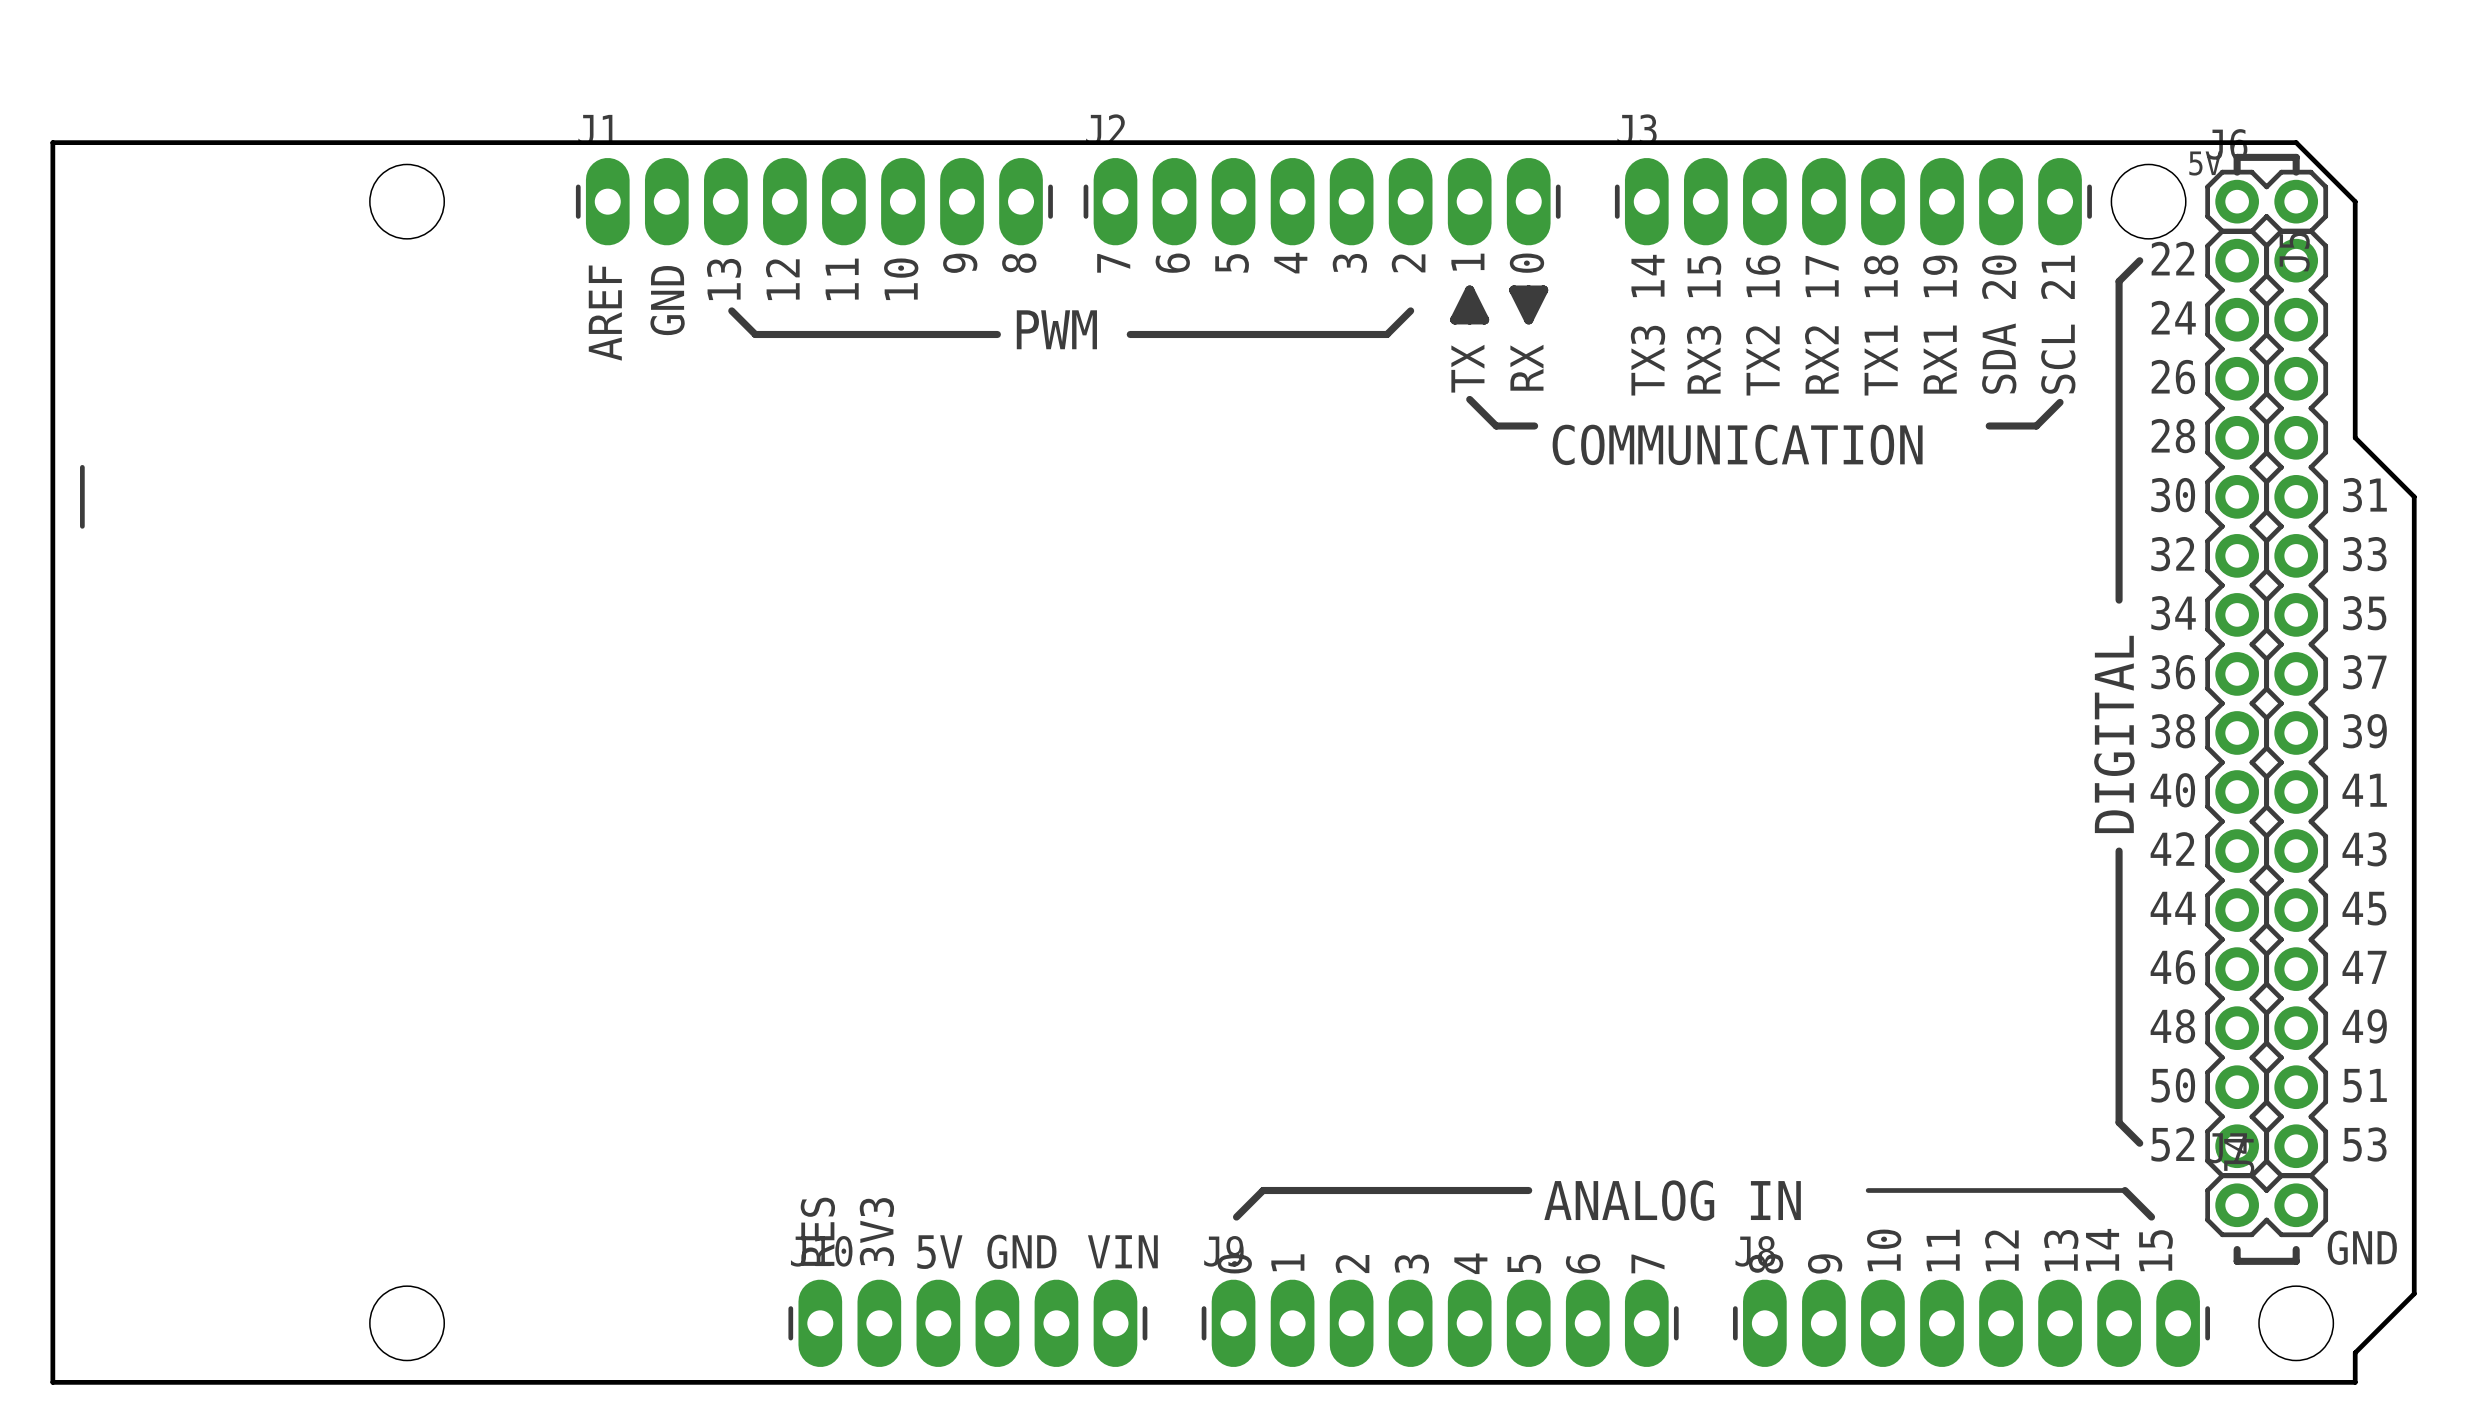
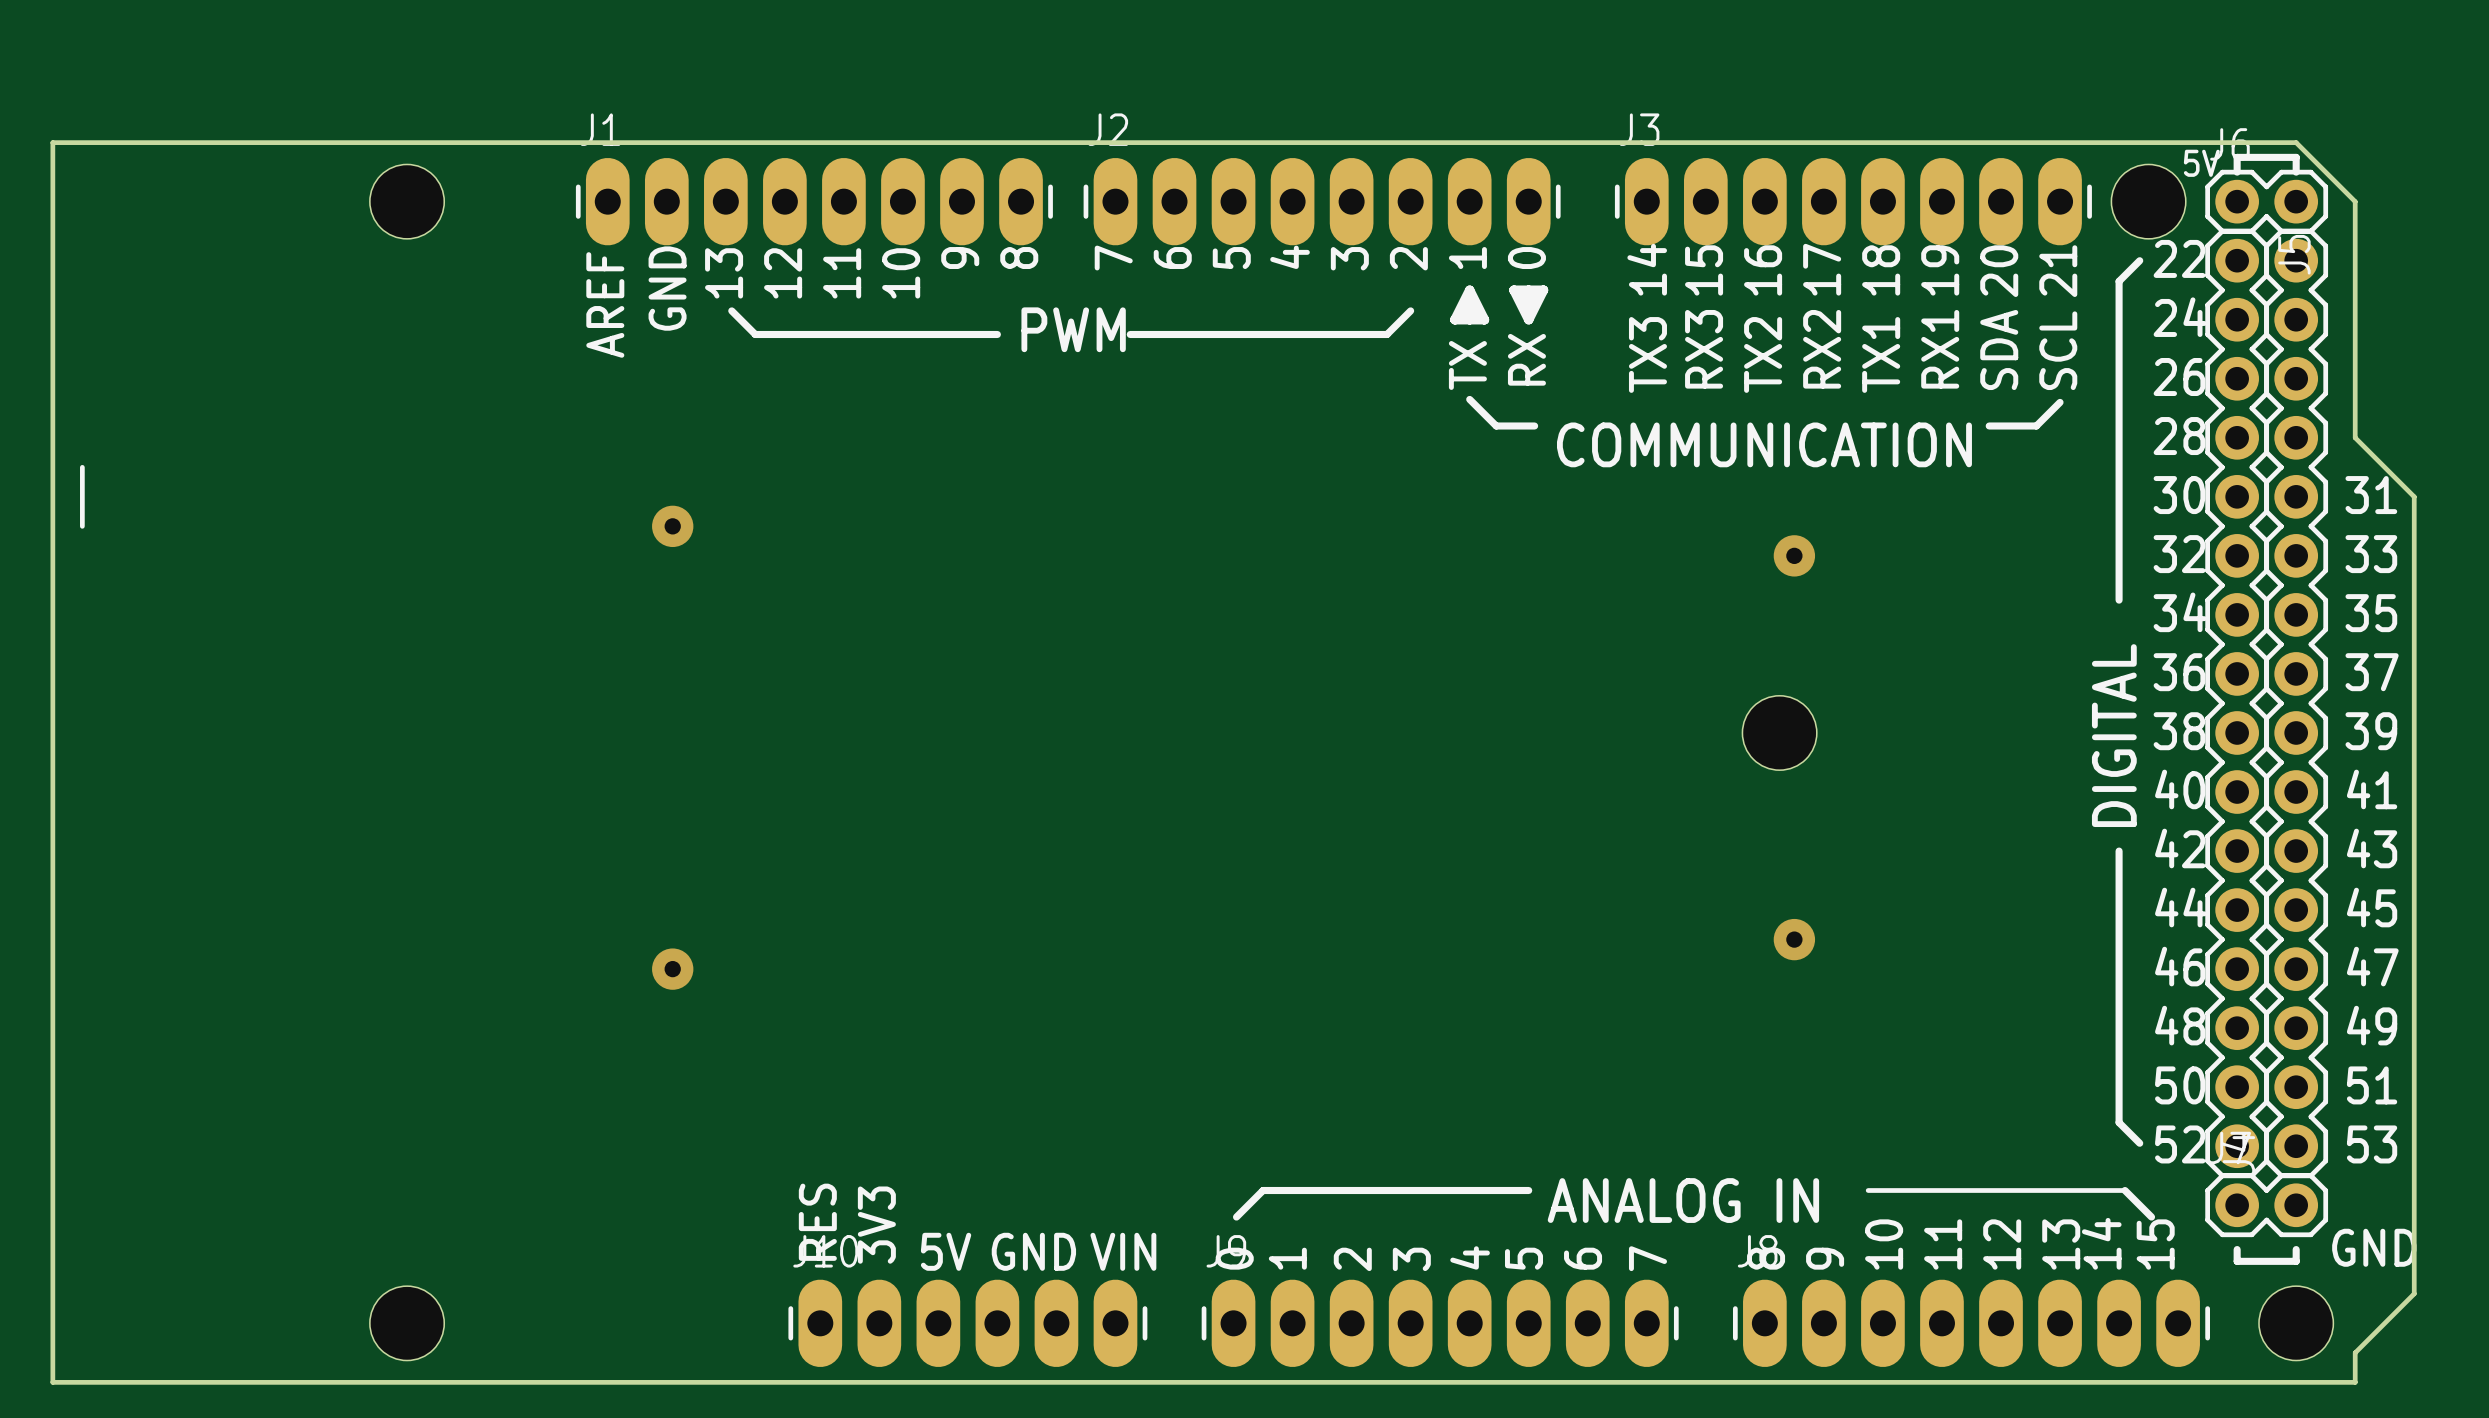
via: none -> (672, 526)
via: none -> (1794, 555)
hole: none -> (1779, 732)
via: none -> (1794, 939)
via: none -> (672, 969)

